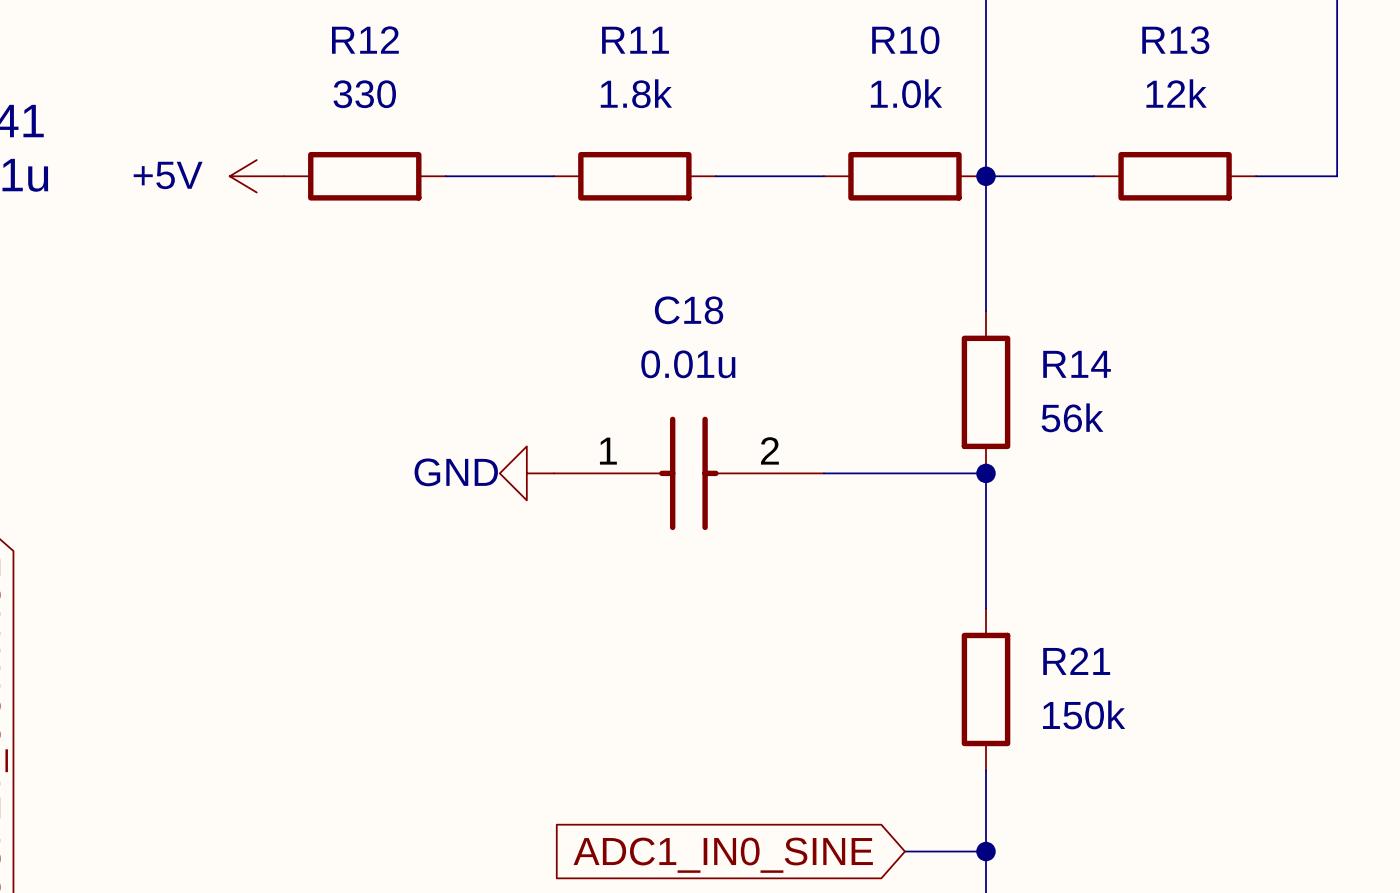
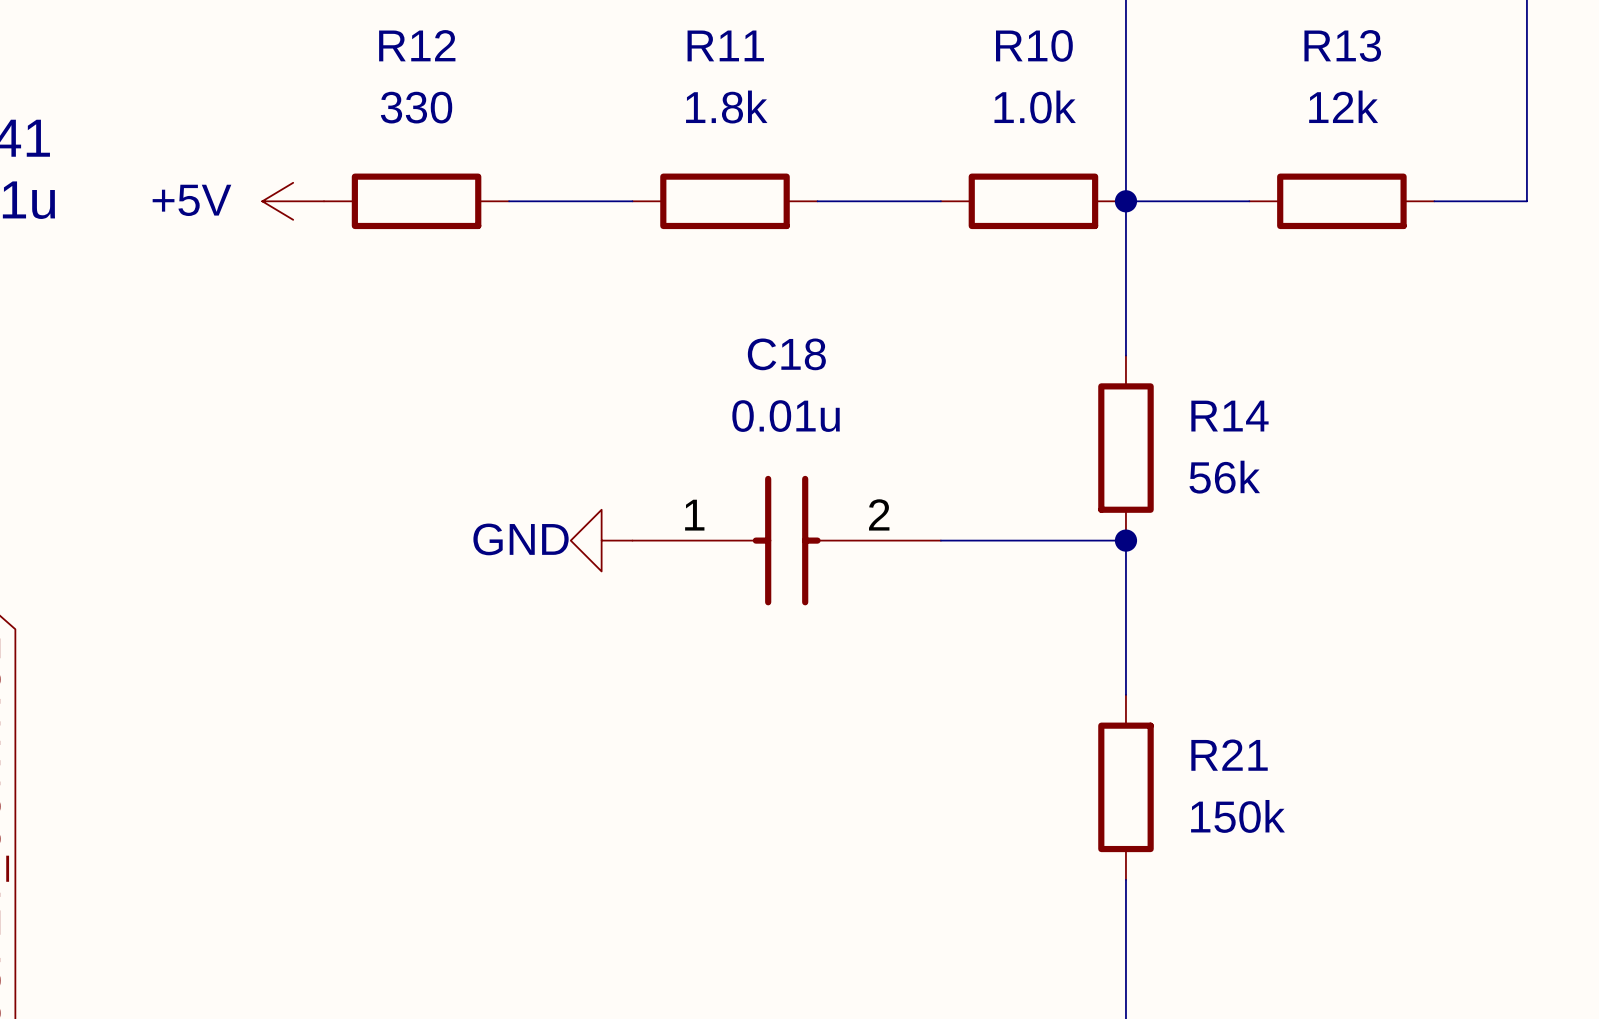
wire: (904, 851) (986, 851) -> none
junction: (986, 851) -> none
global label: ADC1_IN0_SINE (723, 855) -> none

